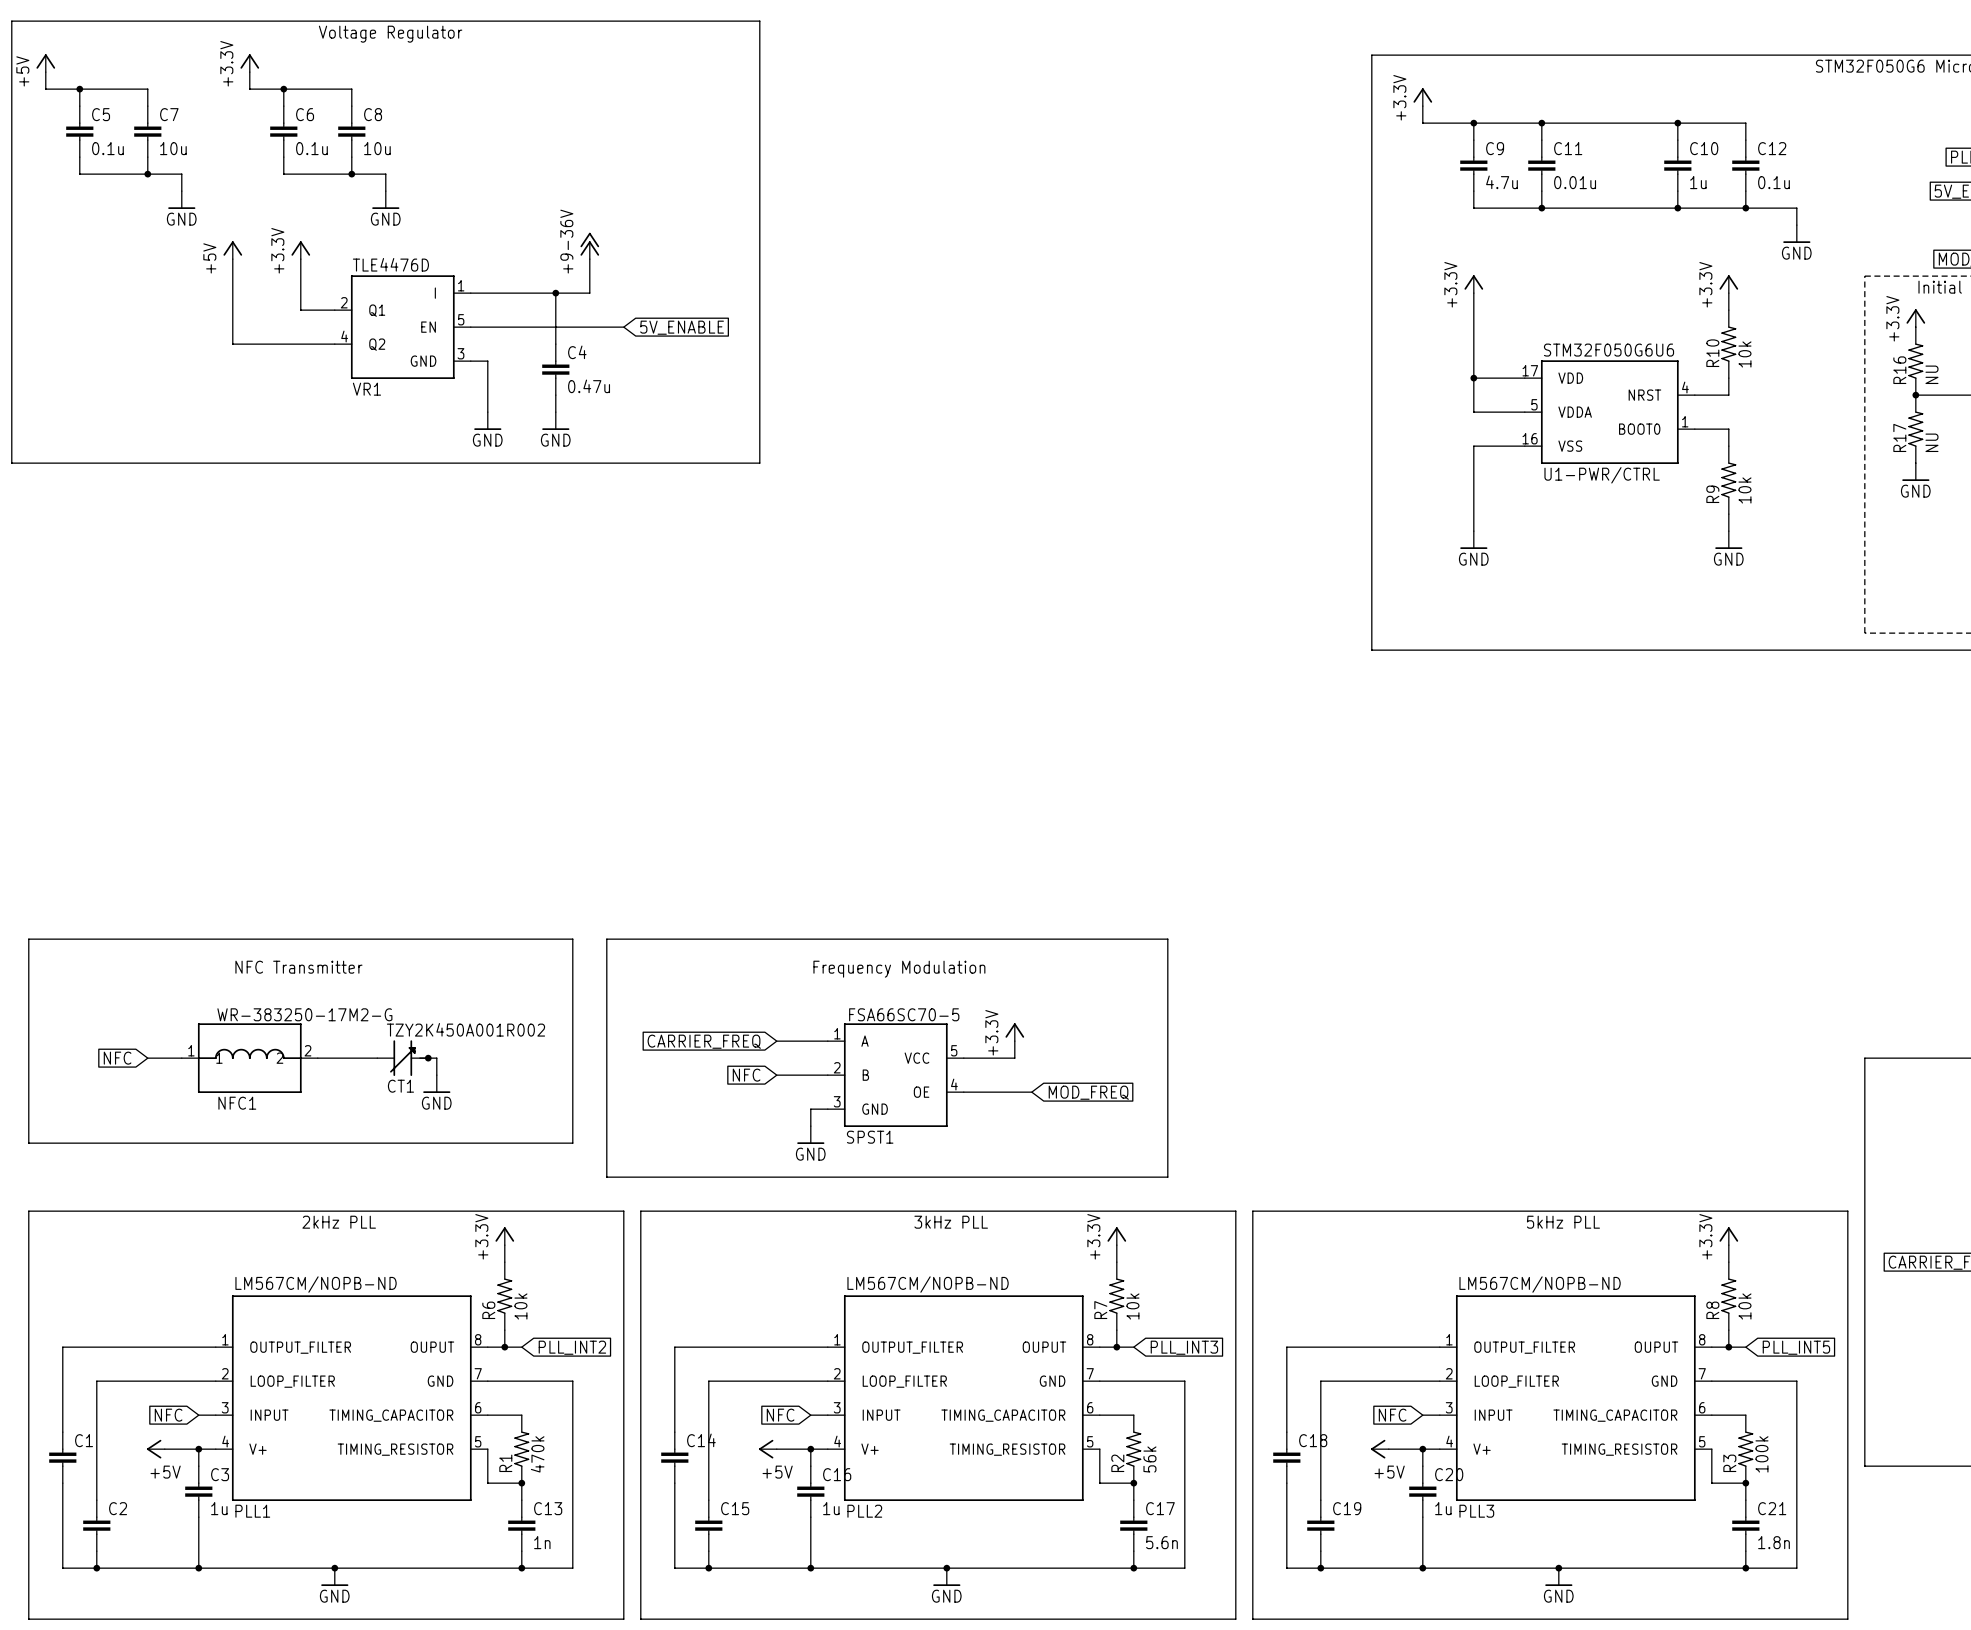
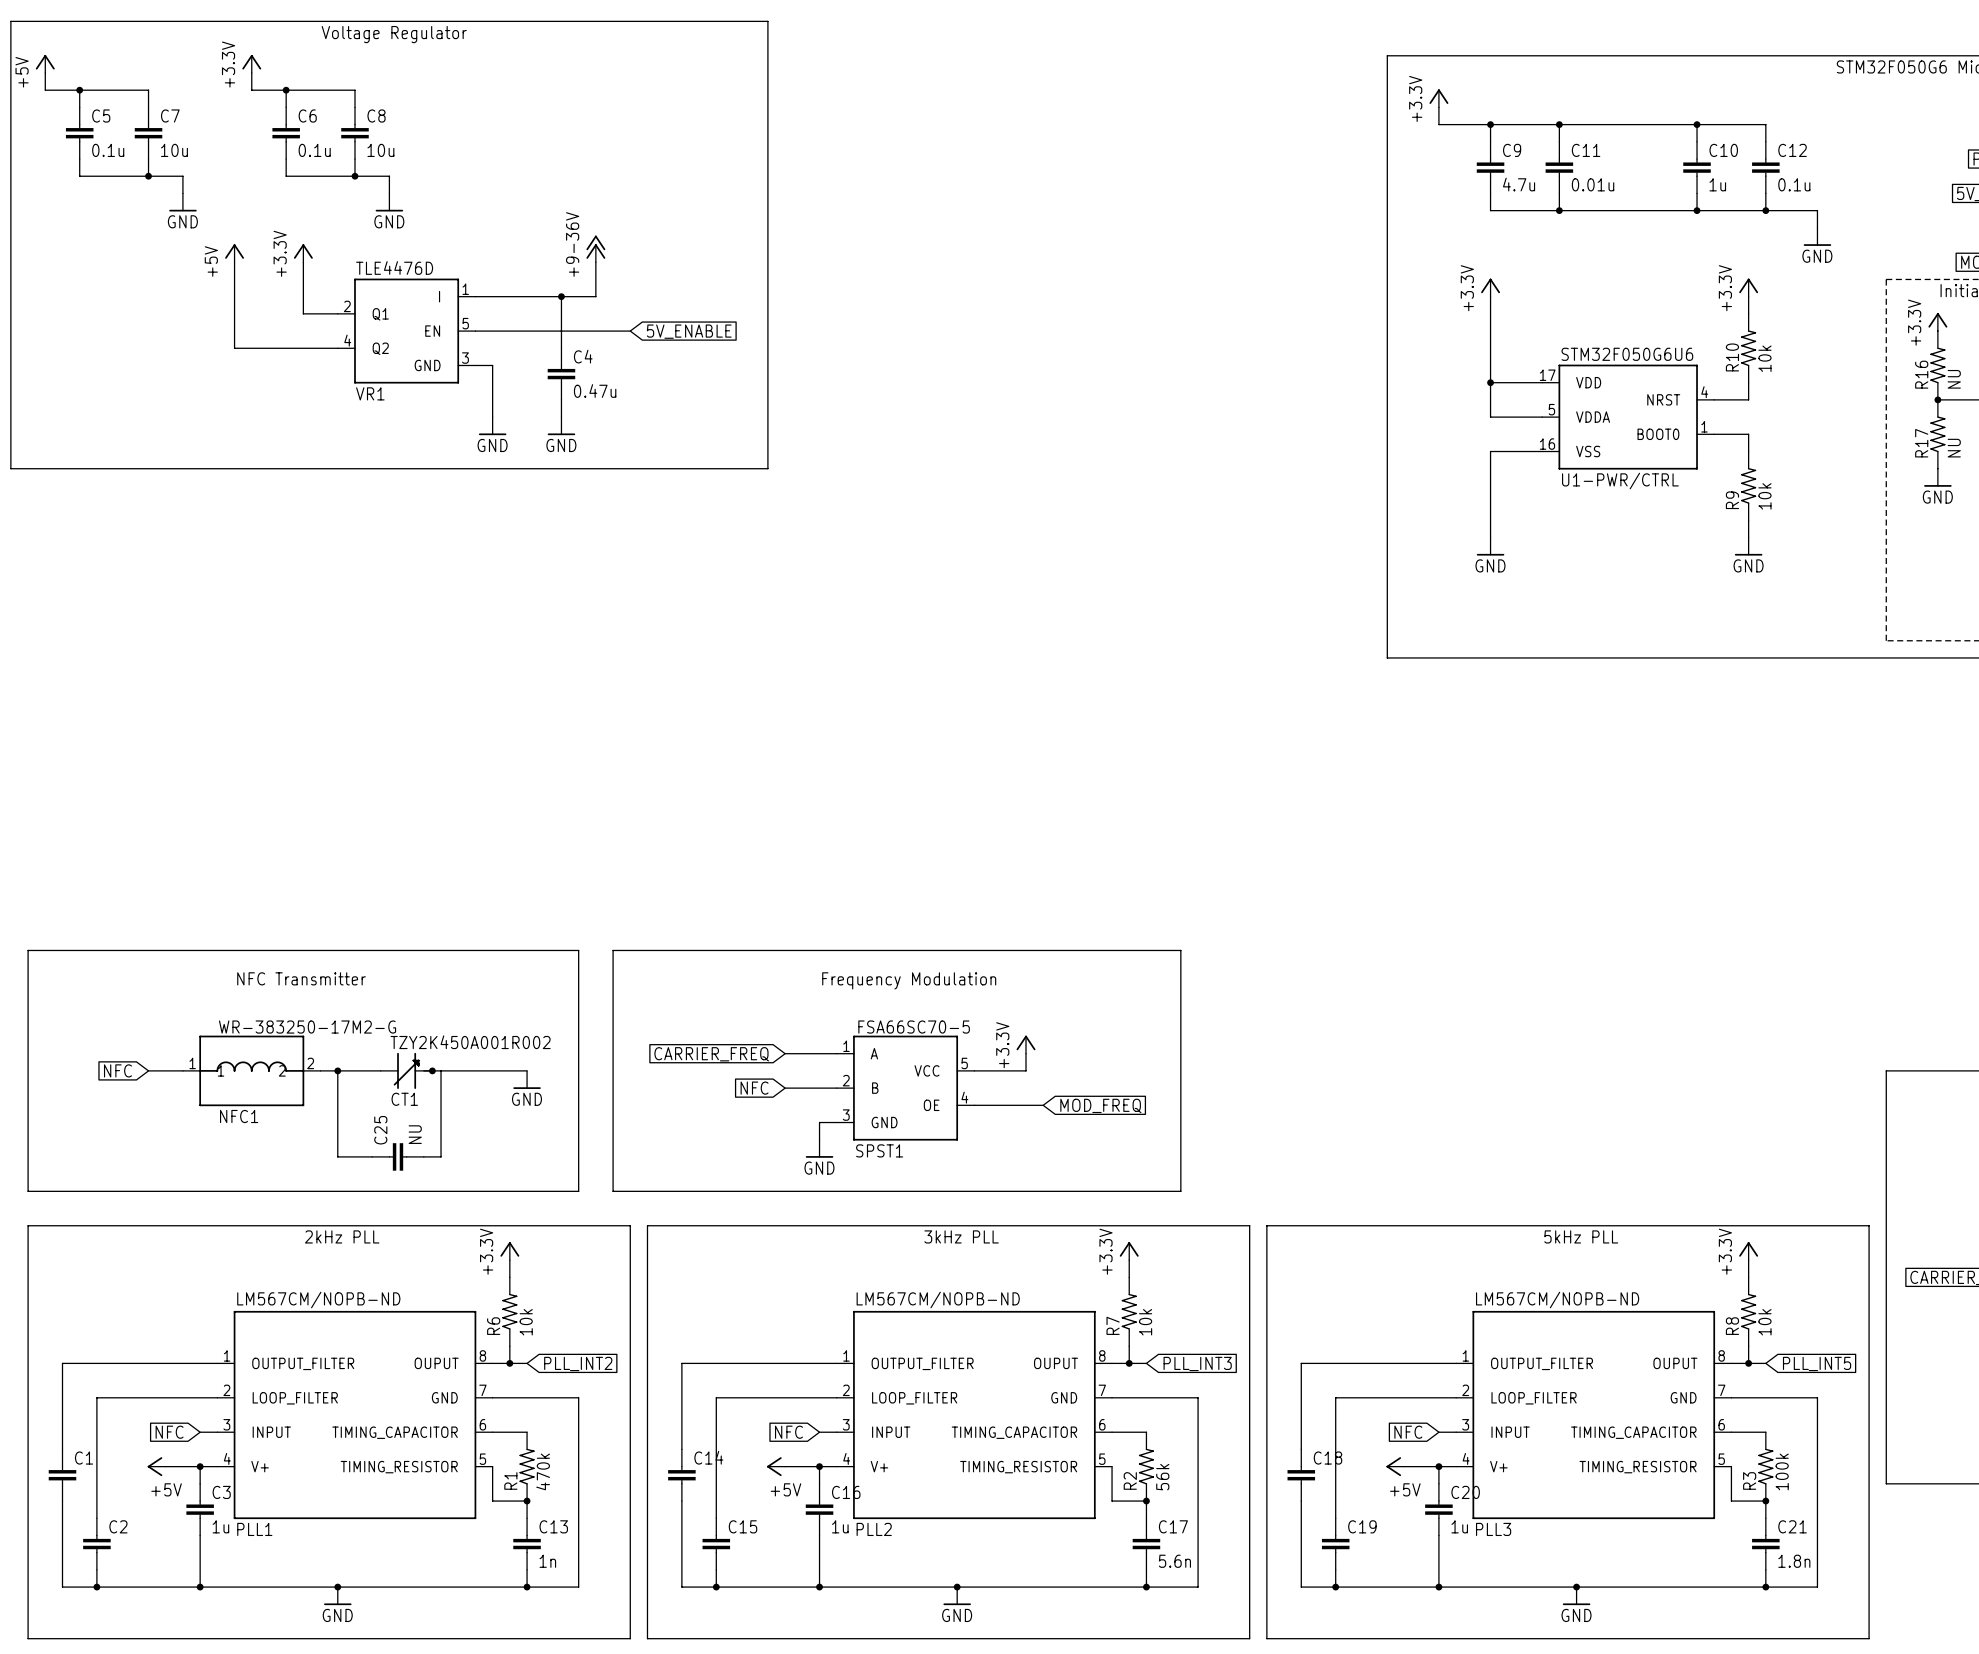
wire: none -> (337, 1070) (337, 1156) (372, 1156)
junction: none -> (337, 1070)
wire: none -> (441, 1070) (527, 1070)
wire: none -> (441, 1088) (441, 1156) (423, 1156)
power symbol position: GND (436, 1084) -> GND (527, 1079)
line: (28, 1143) (572, 1143) -> (28, 1156) (28, 1191) (578, 1191) (578, 1156)
C25: none -> NU (398, 1156)

